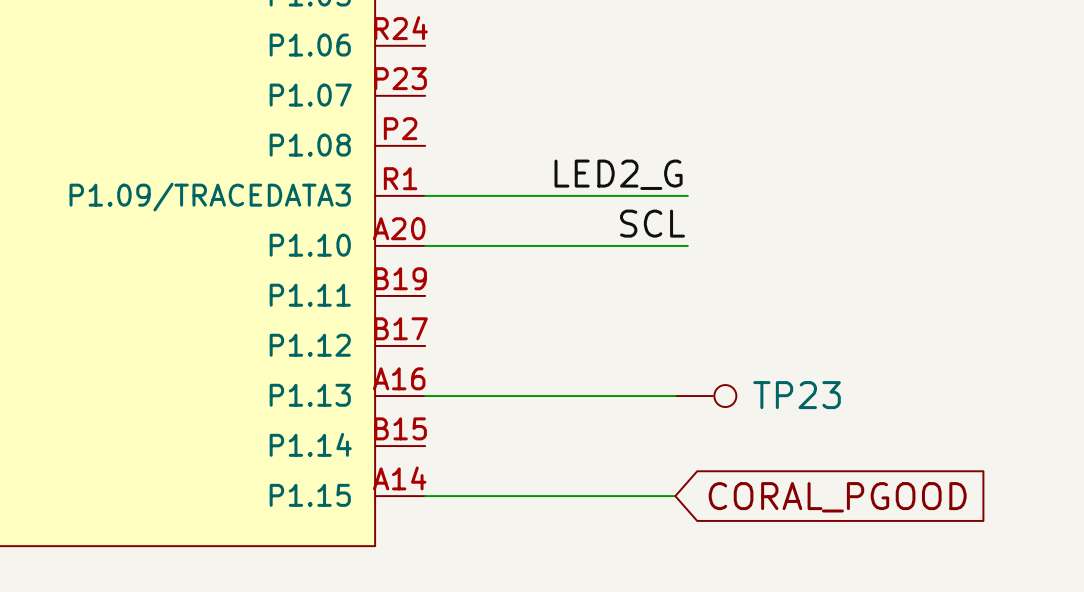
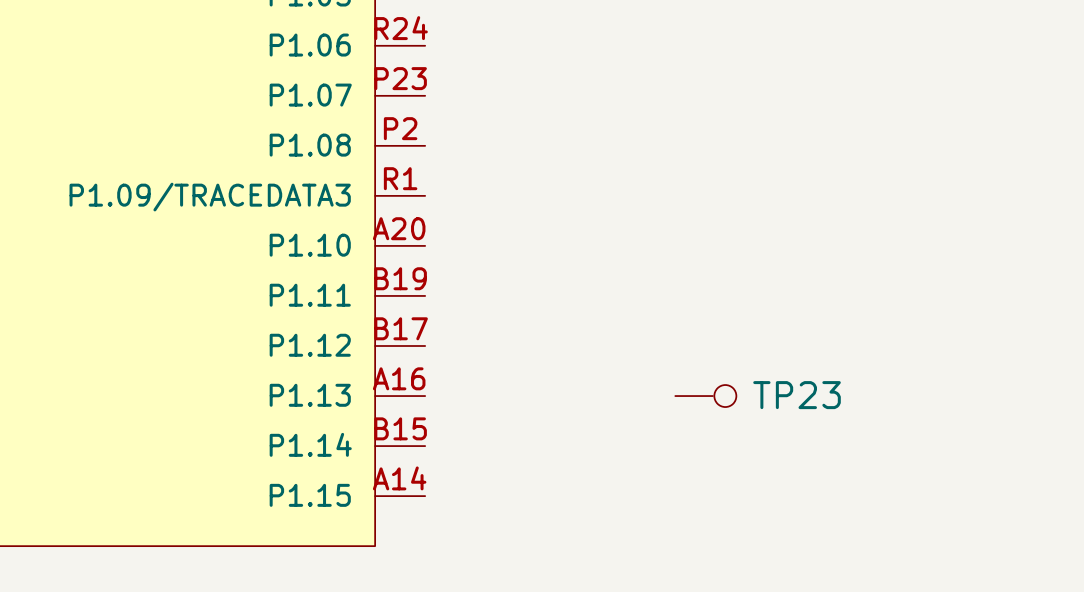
label: LED2_G (618, 174) -> none
wire: (425, 195) (687, 195) -> none
label: SCL (652, 223) -> none
wire: (425, 245) (687, 245) -> none
wire: (425, 396) (675, 396) -> none
wire: (425, 496) (675, 496) -> none
global label: CORAL_PGOOD (837, 497) -> none

